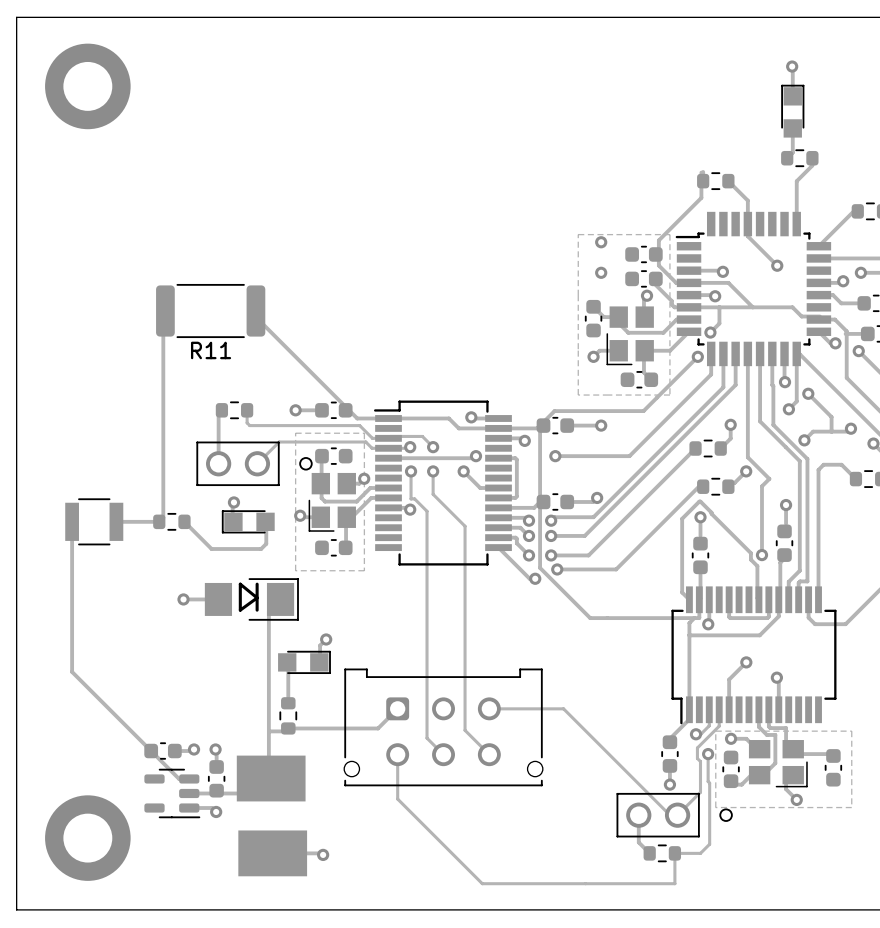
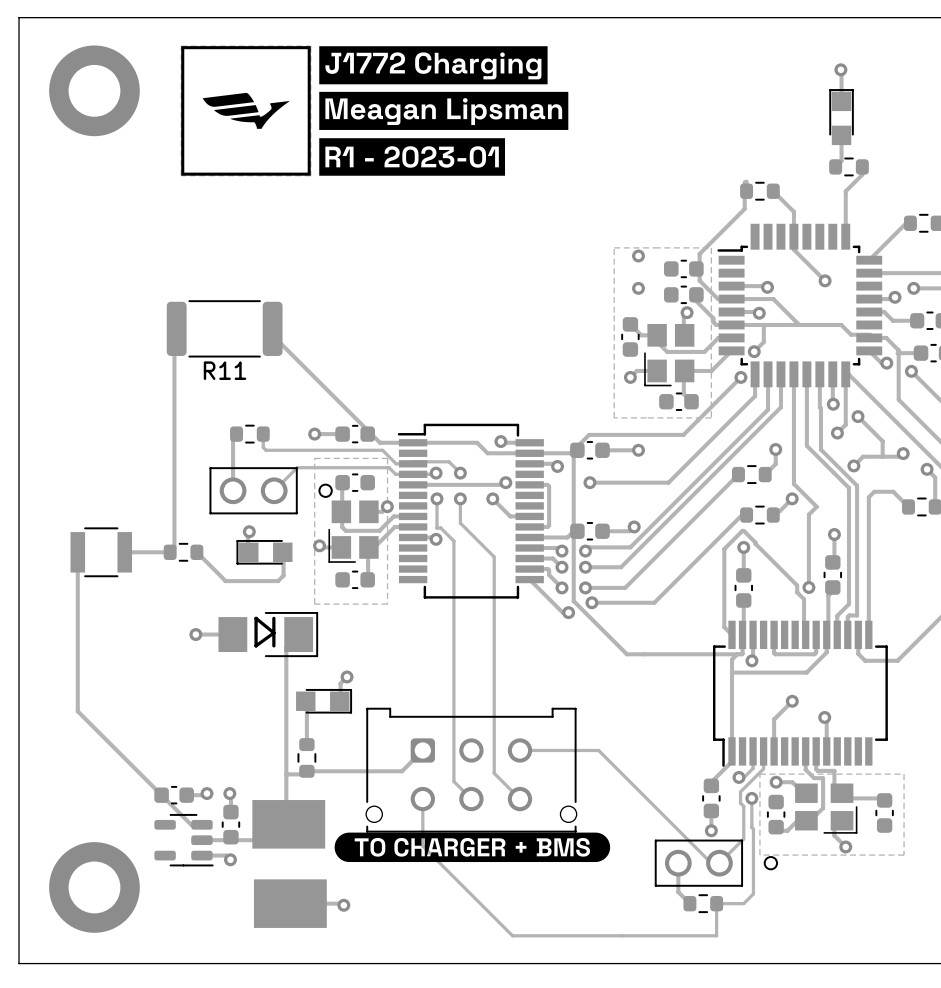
drawing: none -> [181, 46, 569, 176]
drawing: none -> [334, 832, 611, 863]

